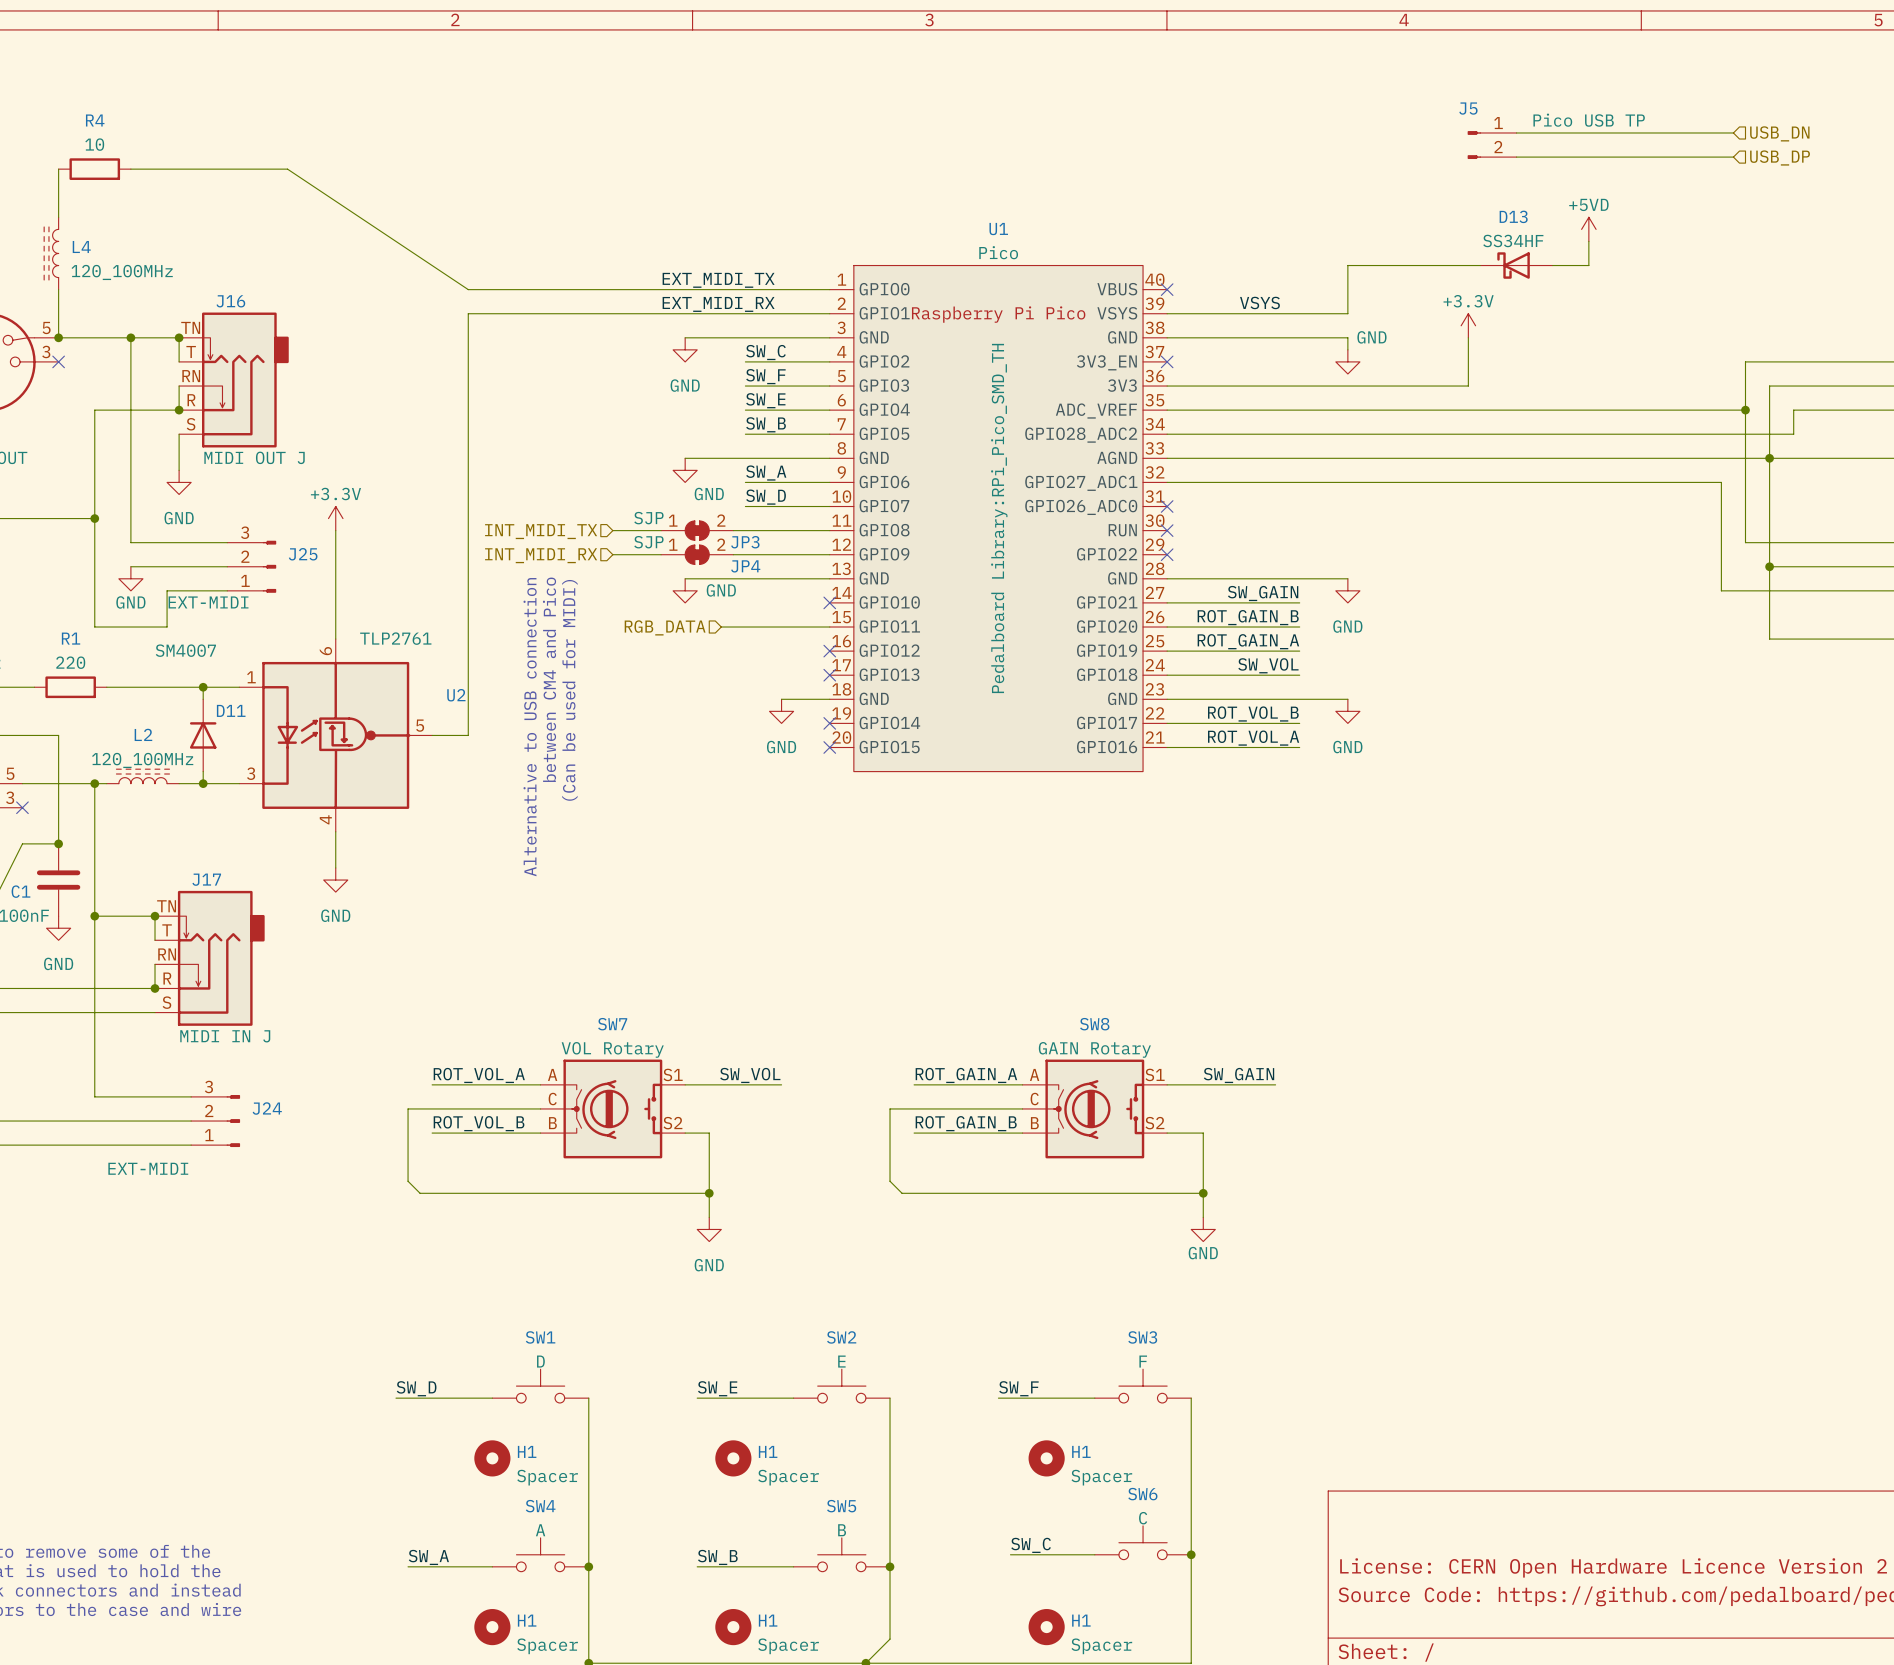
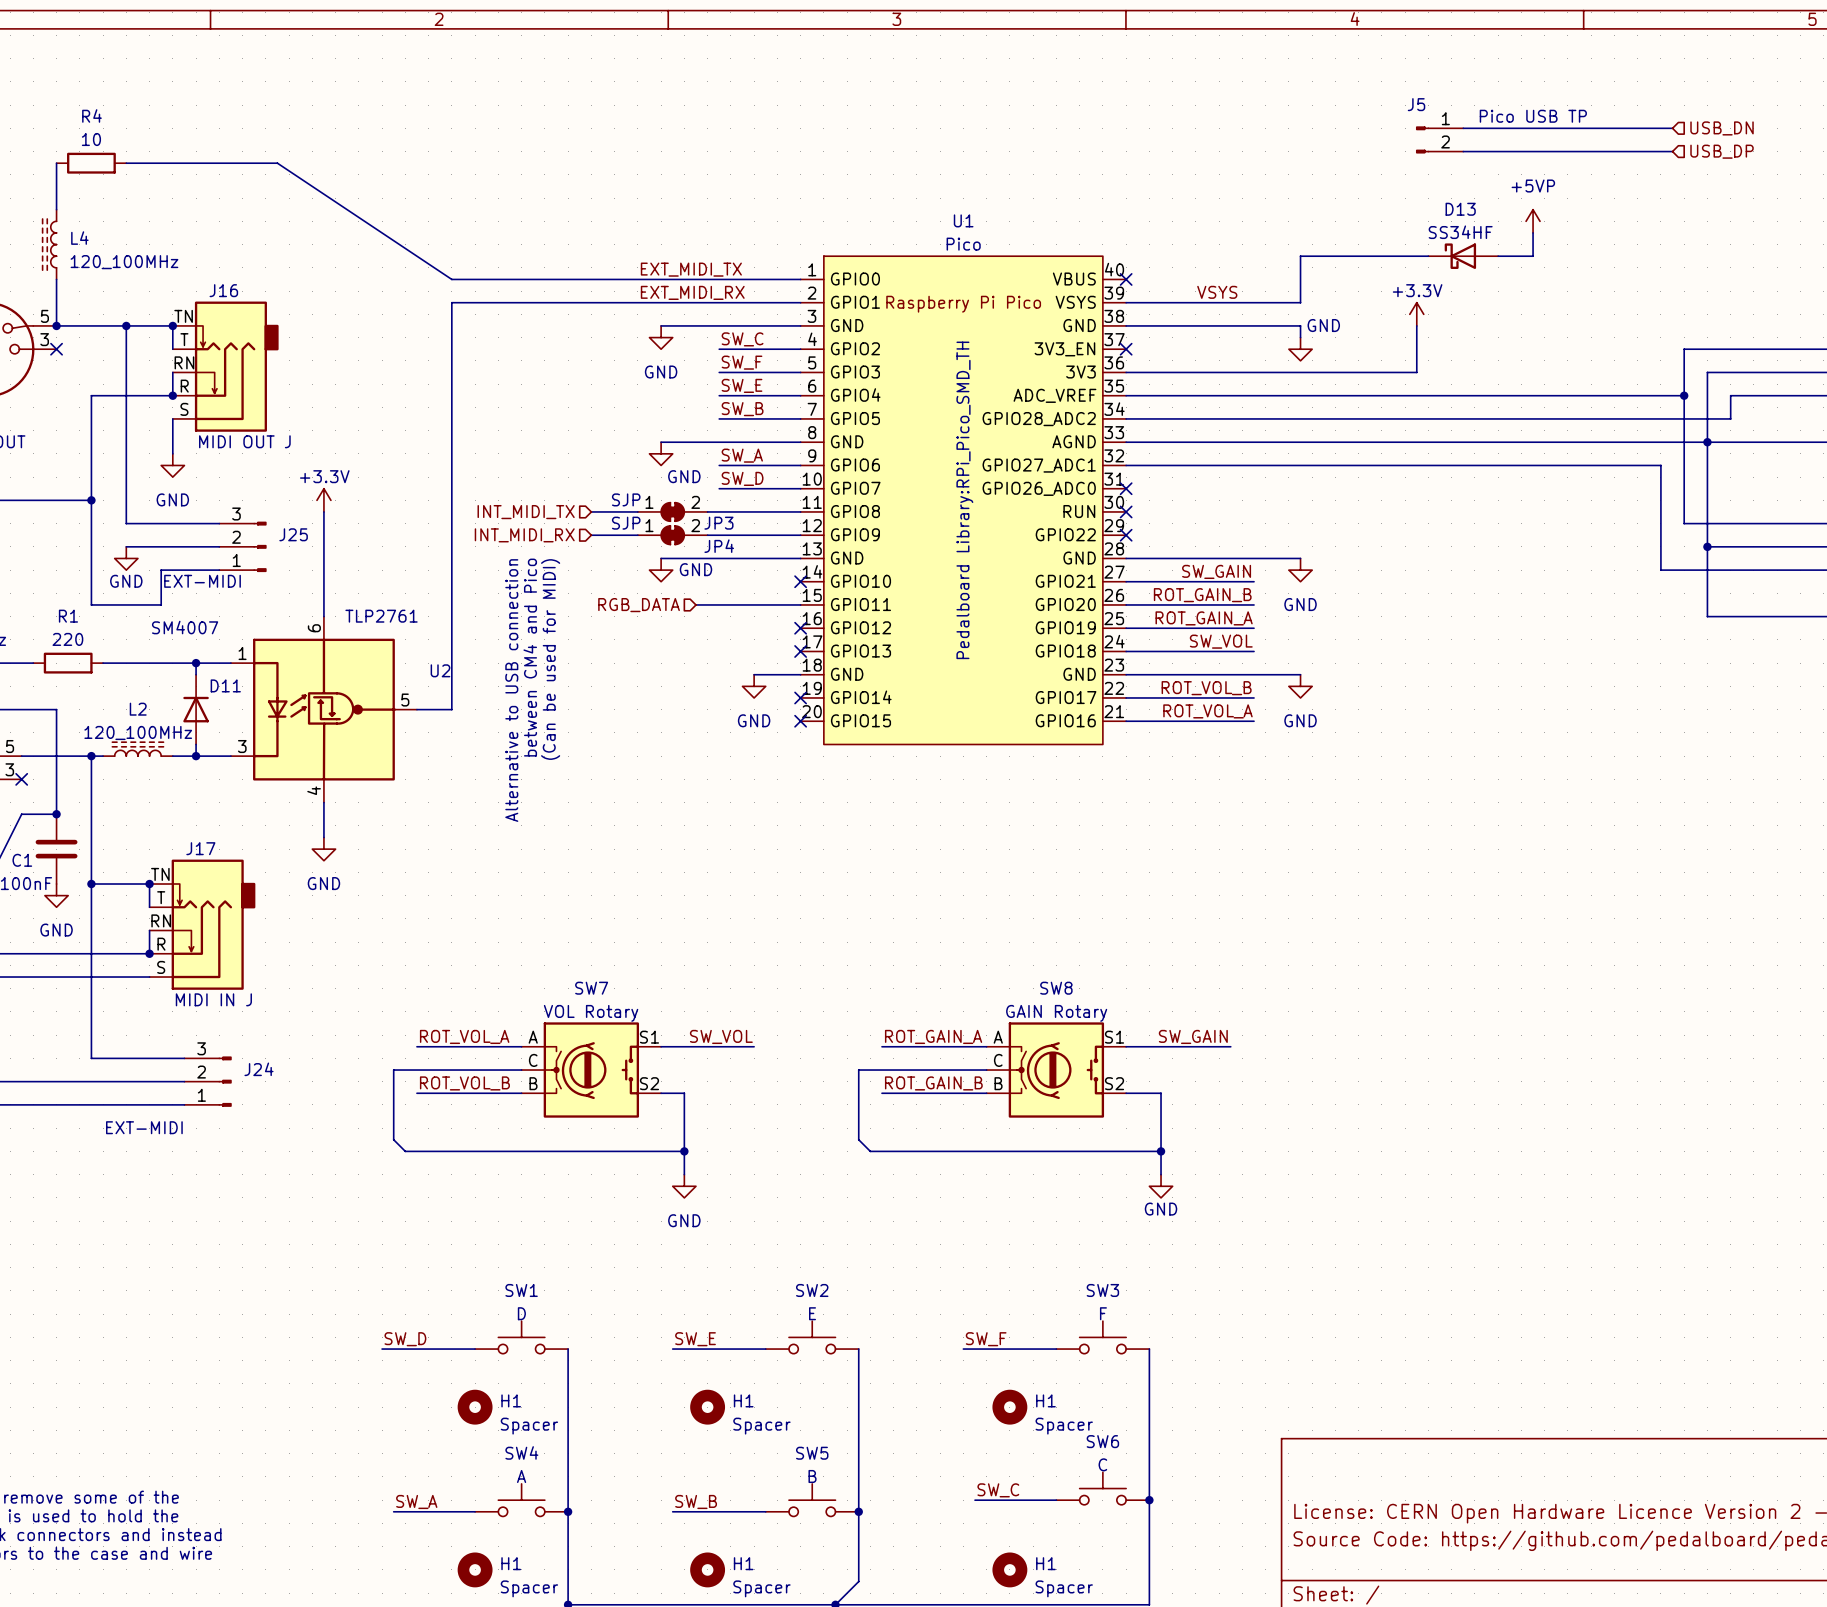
power symbol: +5VD (1588, 229) -> +5VP (1533, 221)

